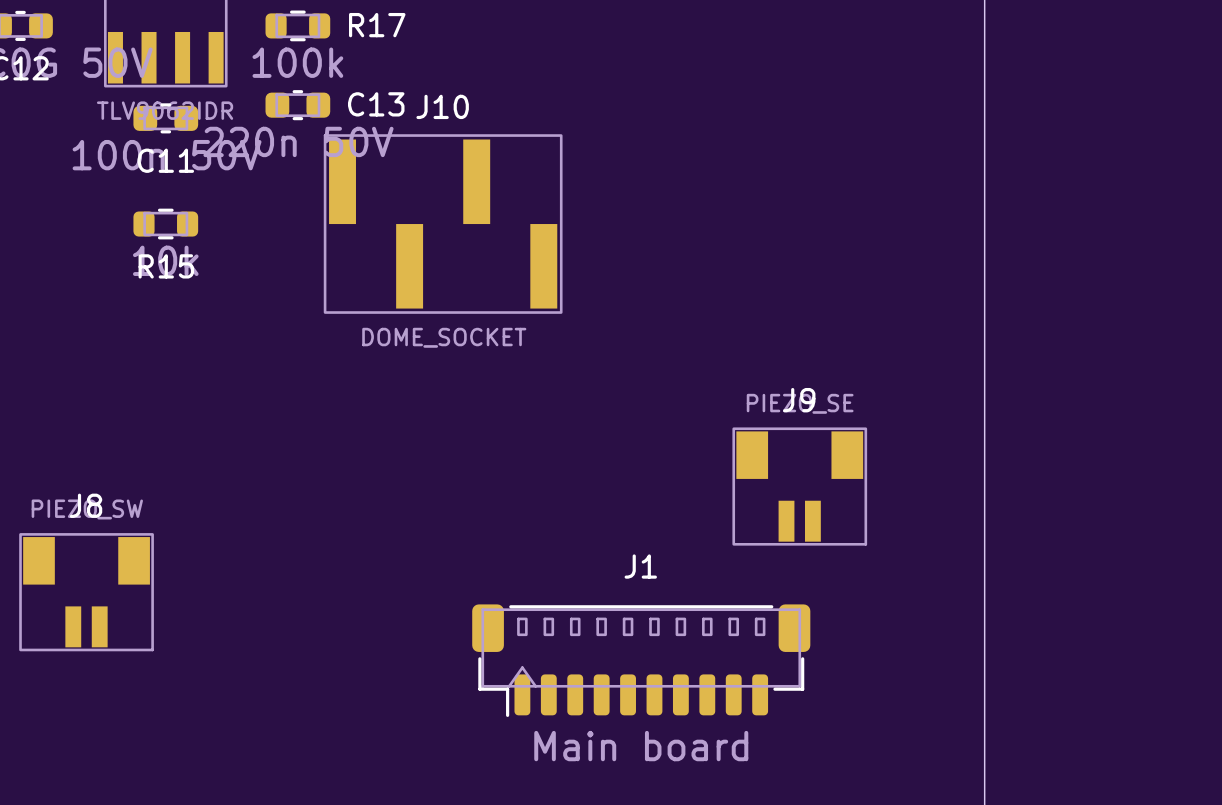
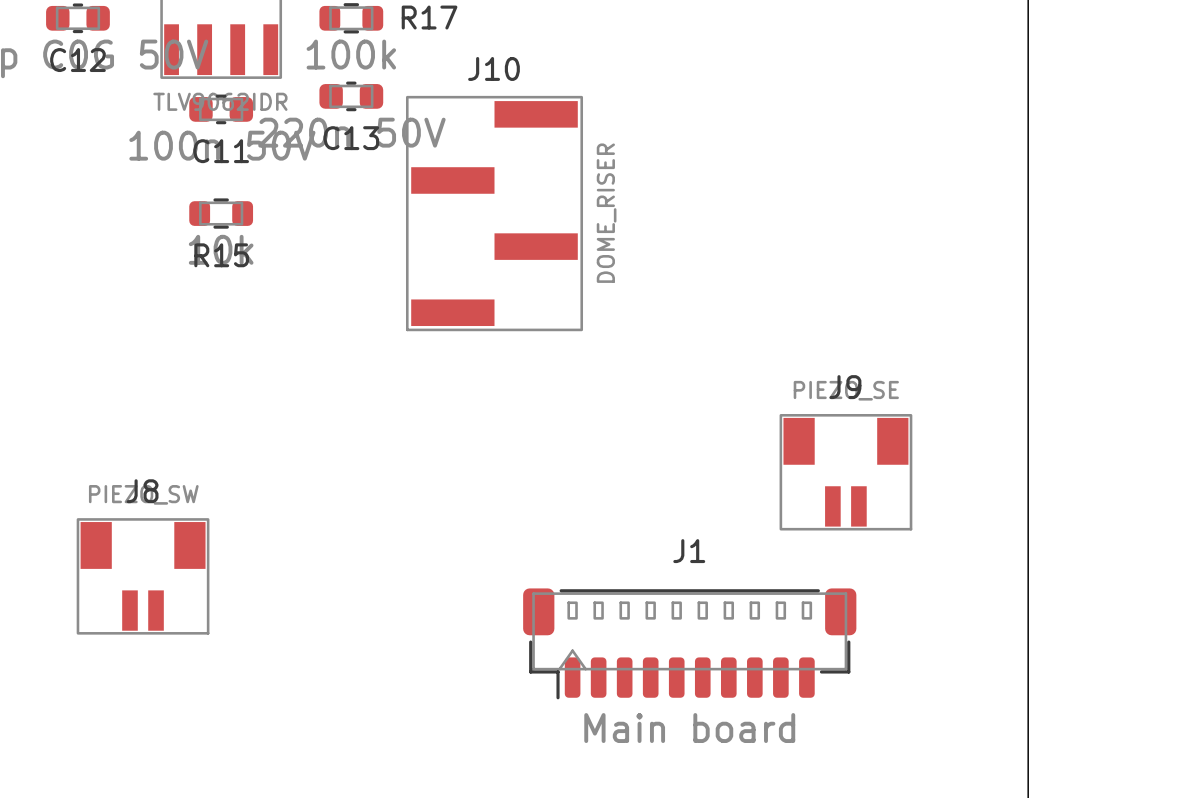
C13 name position: C13 (376, 104) -> C13 (351, 138)
J10 rotation: 0° (443, 224) -> 90° clockwise (494, 213)
J10 value: DOME_SOCKET (444, 337) -> DOME_RISER (606, 213)

